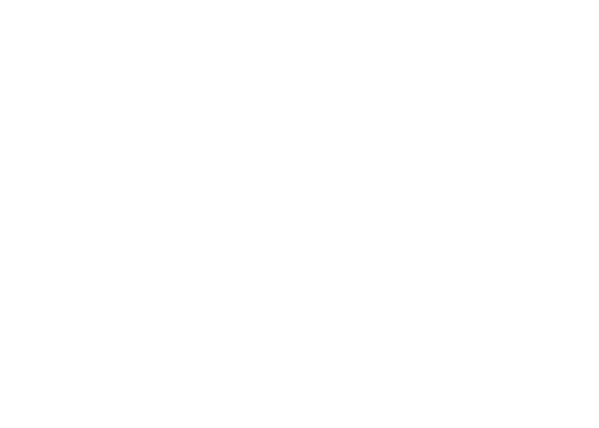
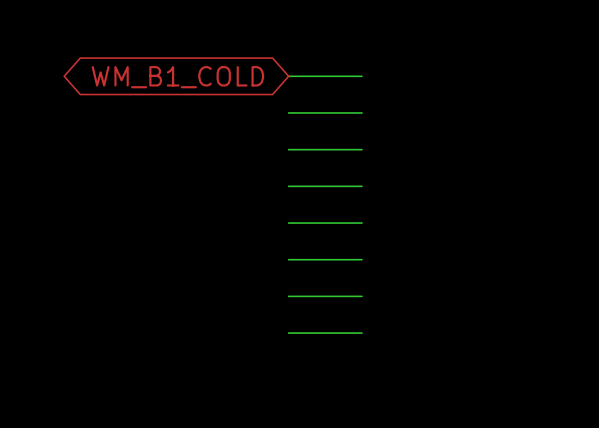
wire: none -> (288, 76) (361, 76)
global label: none -> WM_B1_COLD (177, 77)
wire: none -> (288, 112) (361, 112)
wire: none -> (288, 149) (361, 149)
wire: none -> (288, 186) (361, 186)
wire: none -> (288, 223) (361, 223)
wire: none -> (288, 259) (361, 259)
wire: none -> (288, 296) (361, 296)
wire: none -> (288, 333) (361, 333)

